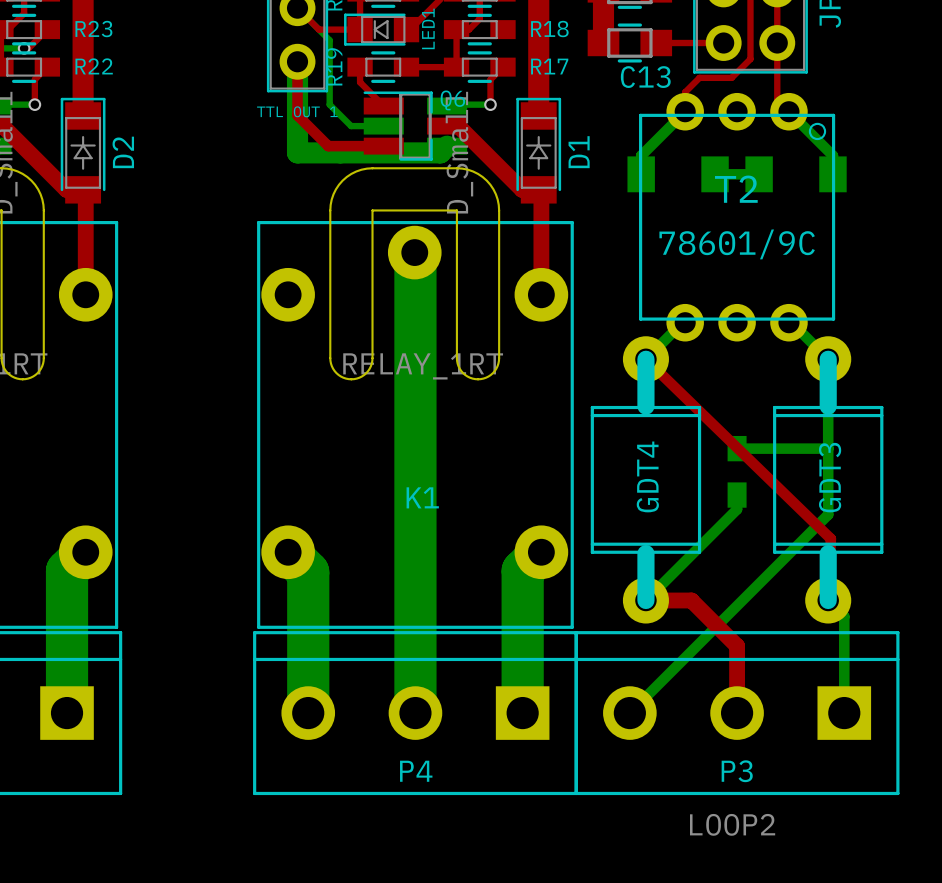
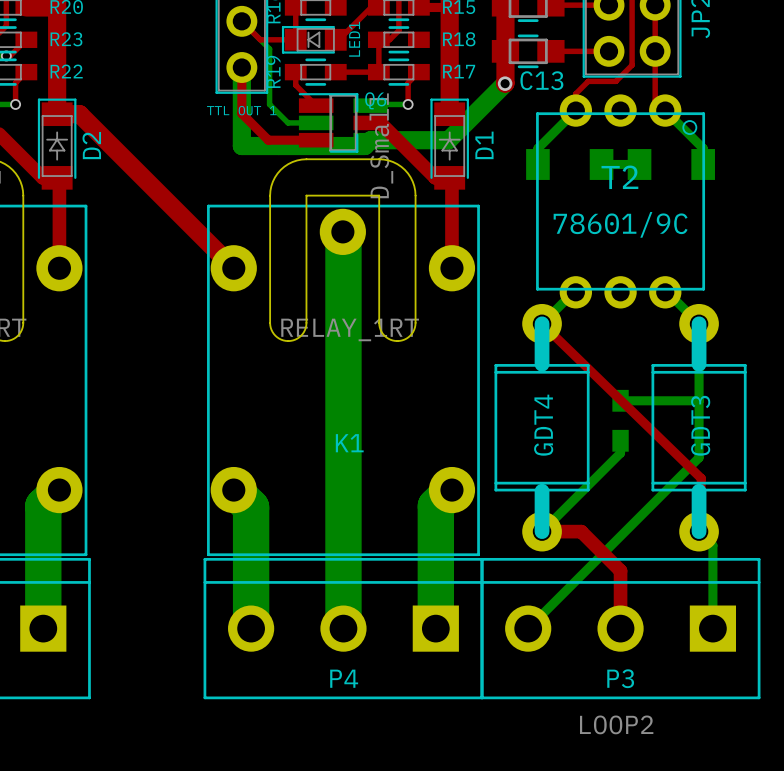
top track: none -> (505, 51) (505, 83)
bottom track: none -> (505, 83) (448, 140) (370, 140)
via: none -> (505, 83)
top track: none -> (57, 114) (79, 114) (233, 268)

